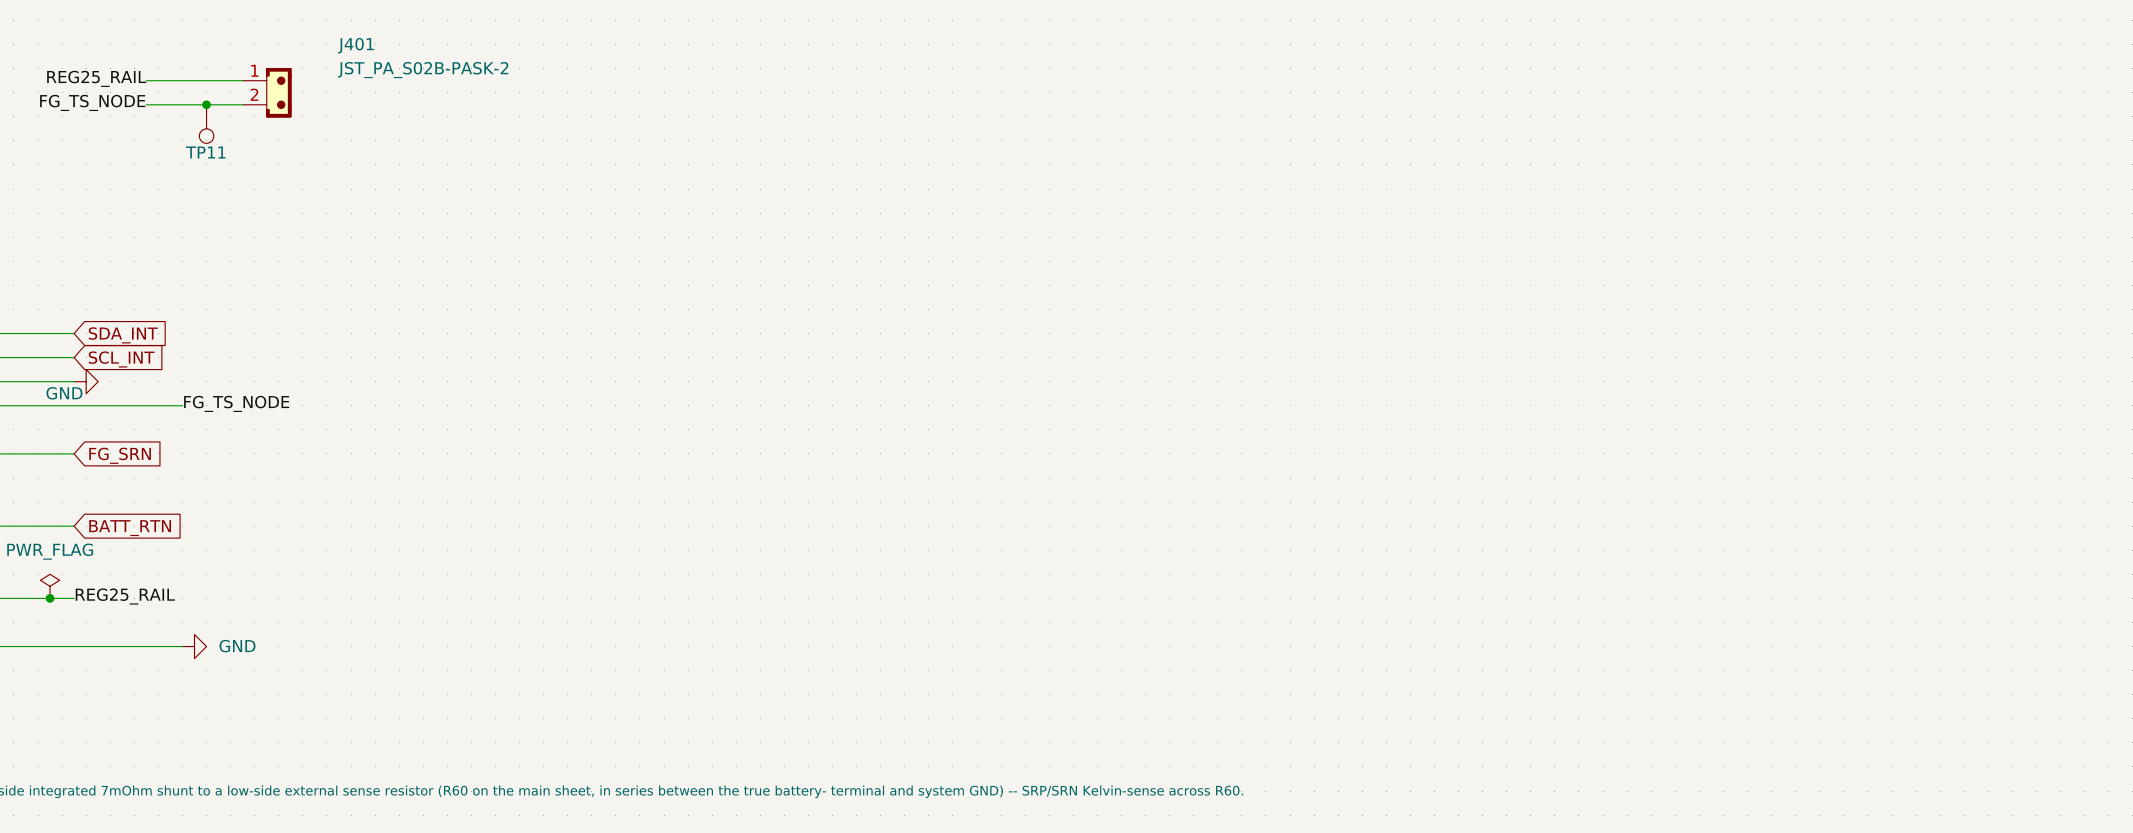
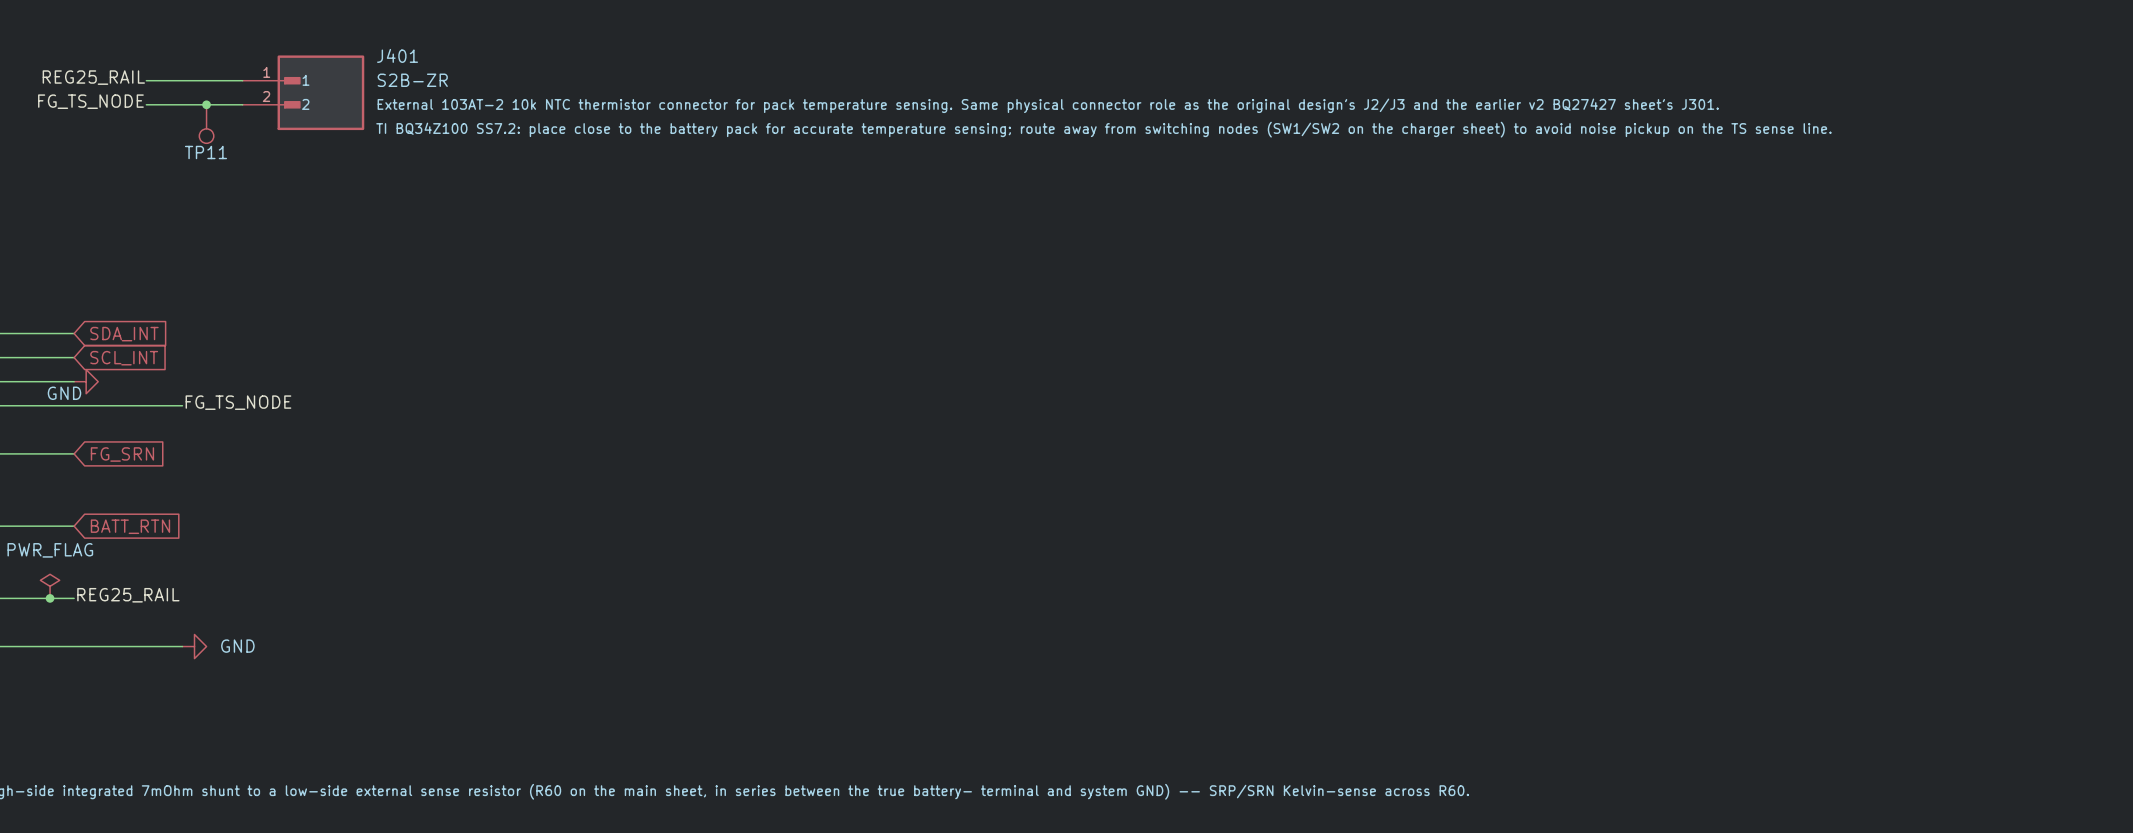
J401 symbol: [242, 68, 291, 117] -> [242, 55, 365, 131]
J401 value: JST_PA_S02B-PASK-2 (423, 70) -> S2B-ZR (412, 80)
J401 text: none -> External 103AT-2 10k NTC thermistor connector for pack temperature sensing. Same physical connector role as the original design's J2/J3 and the earlier v2 BQ27427 sheet's J301. (1048, 105)
J401 text: none -> TI BQ34Z100 SS7.2: place close to the battery pack for accurate temperature sensing; route away from switching nodes (SW1/SW2 on the charger sheet) to avoid noise pickup on the TS sense line. (1103, 129)

